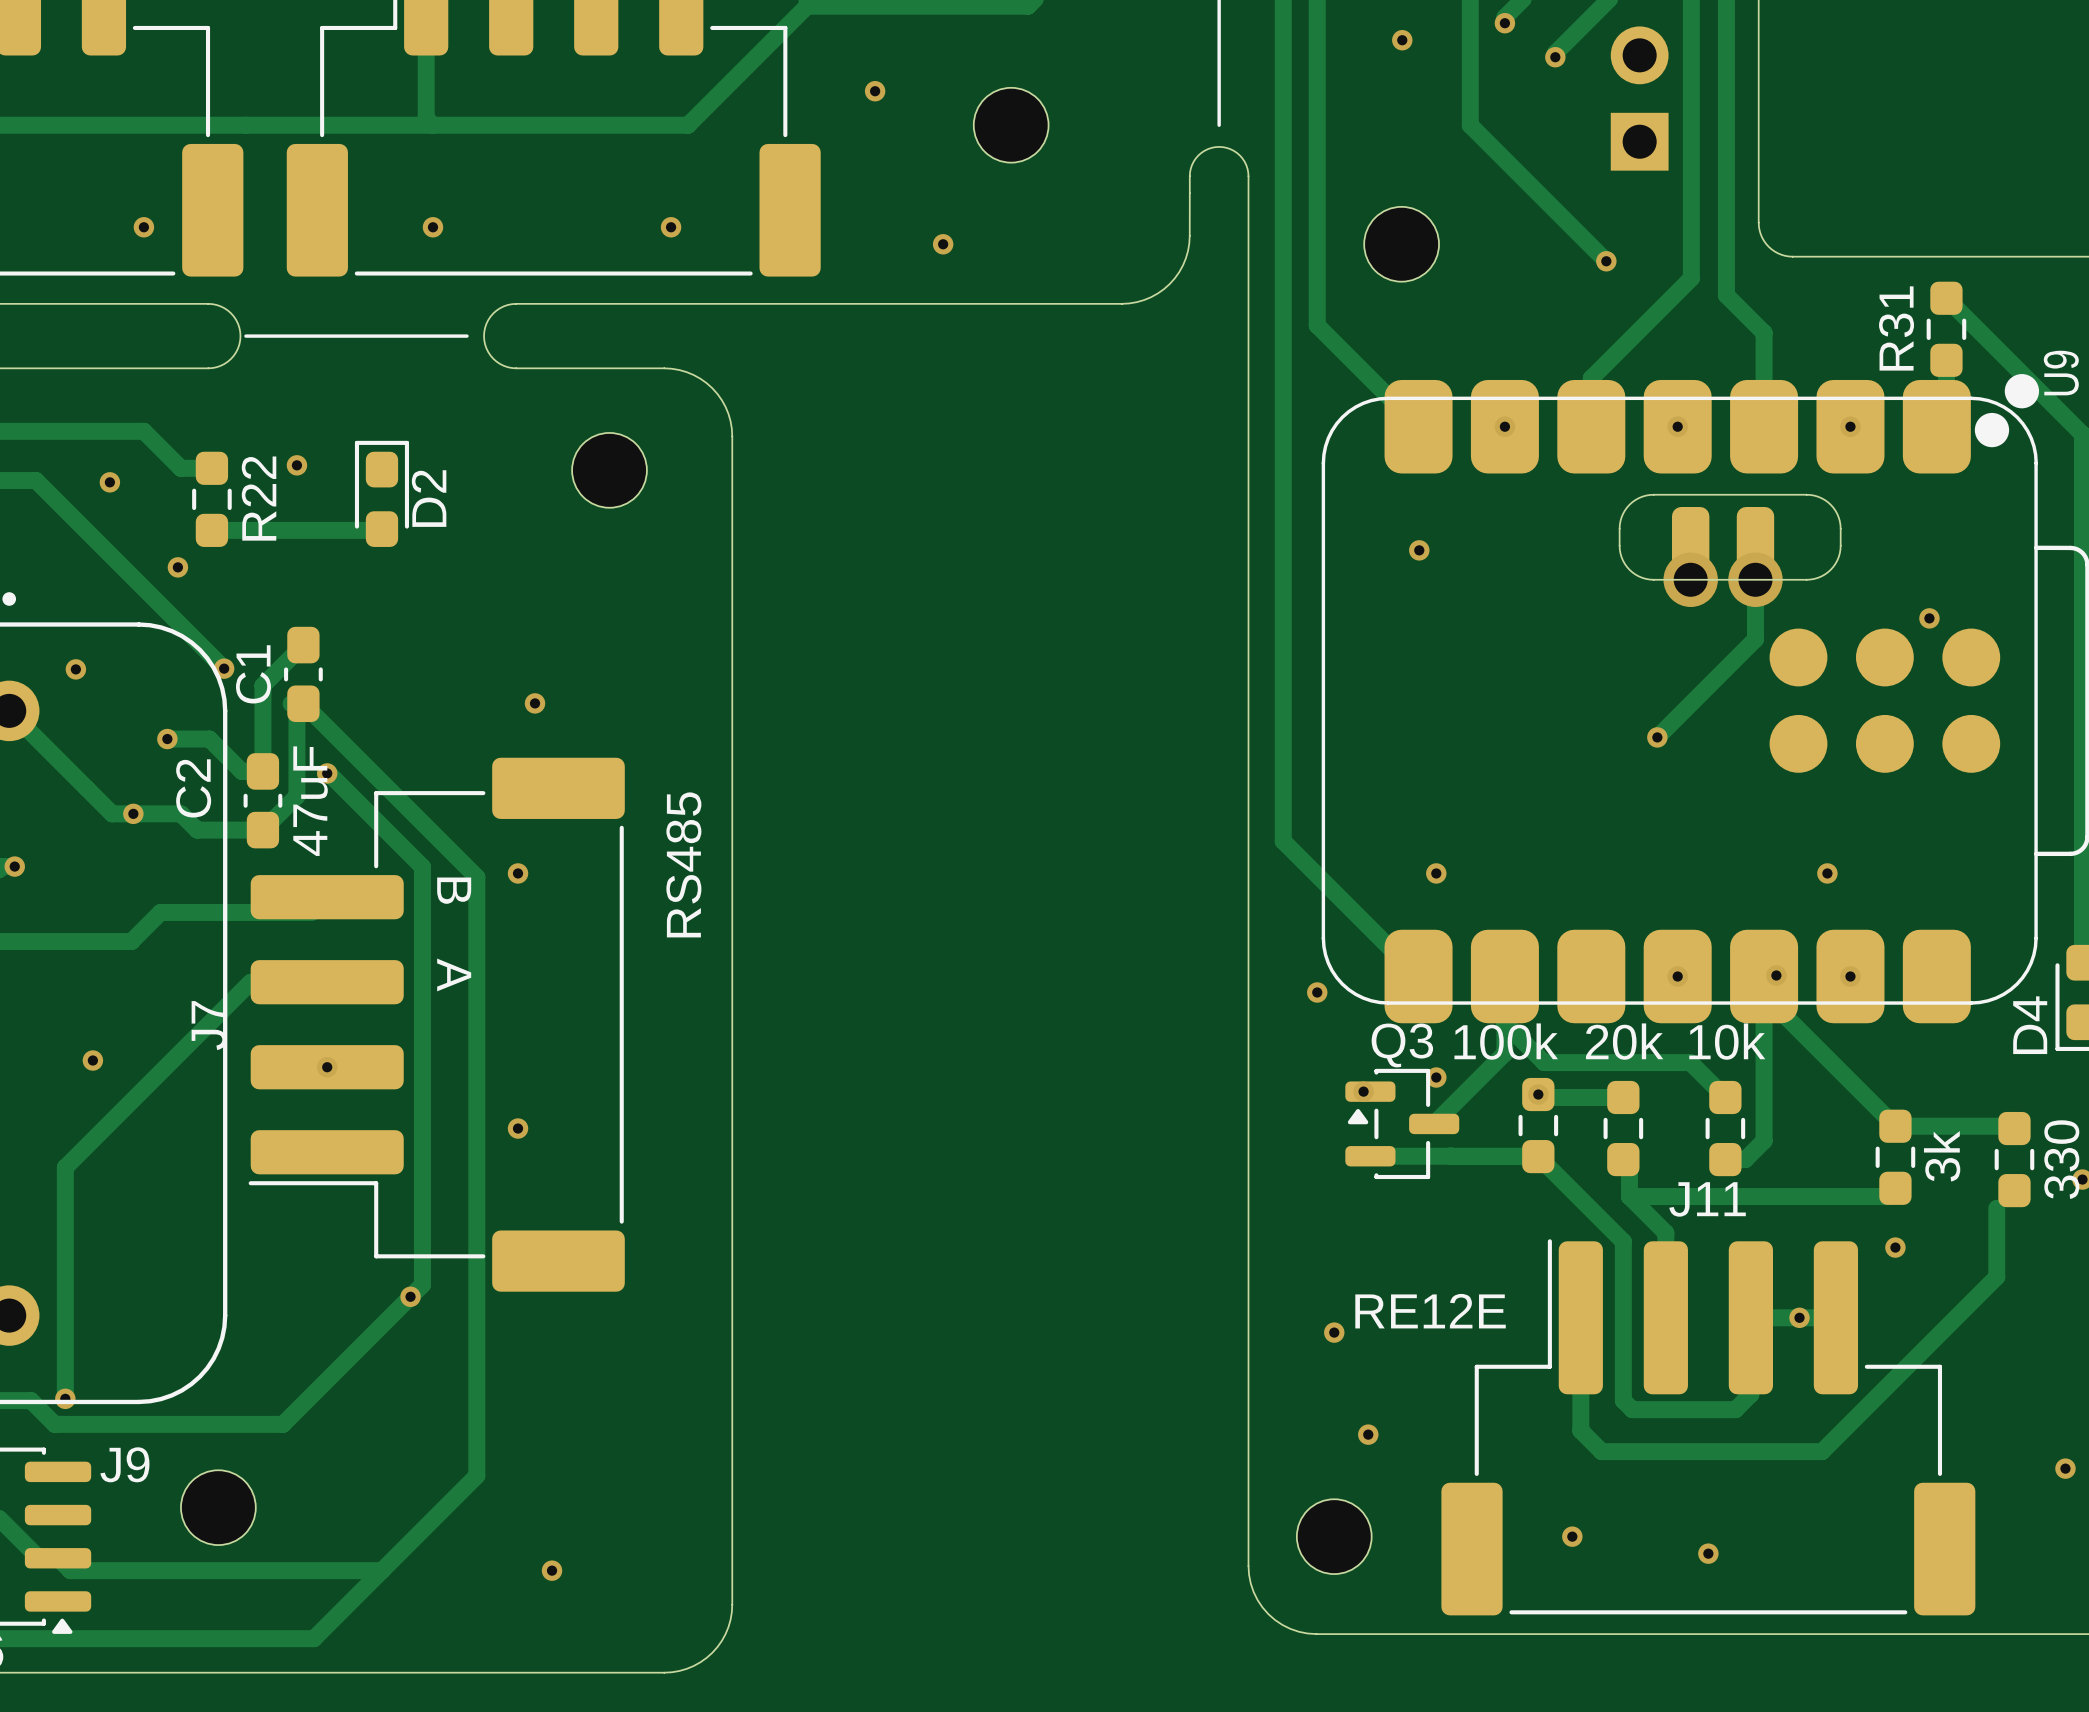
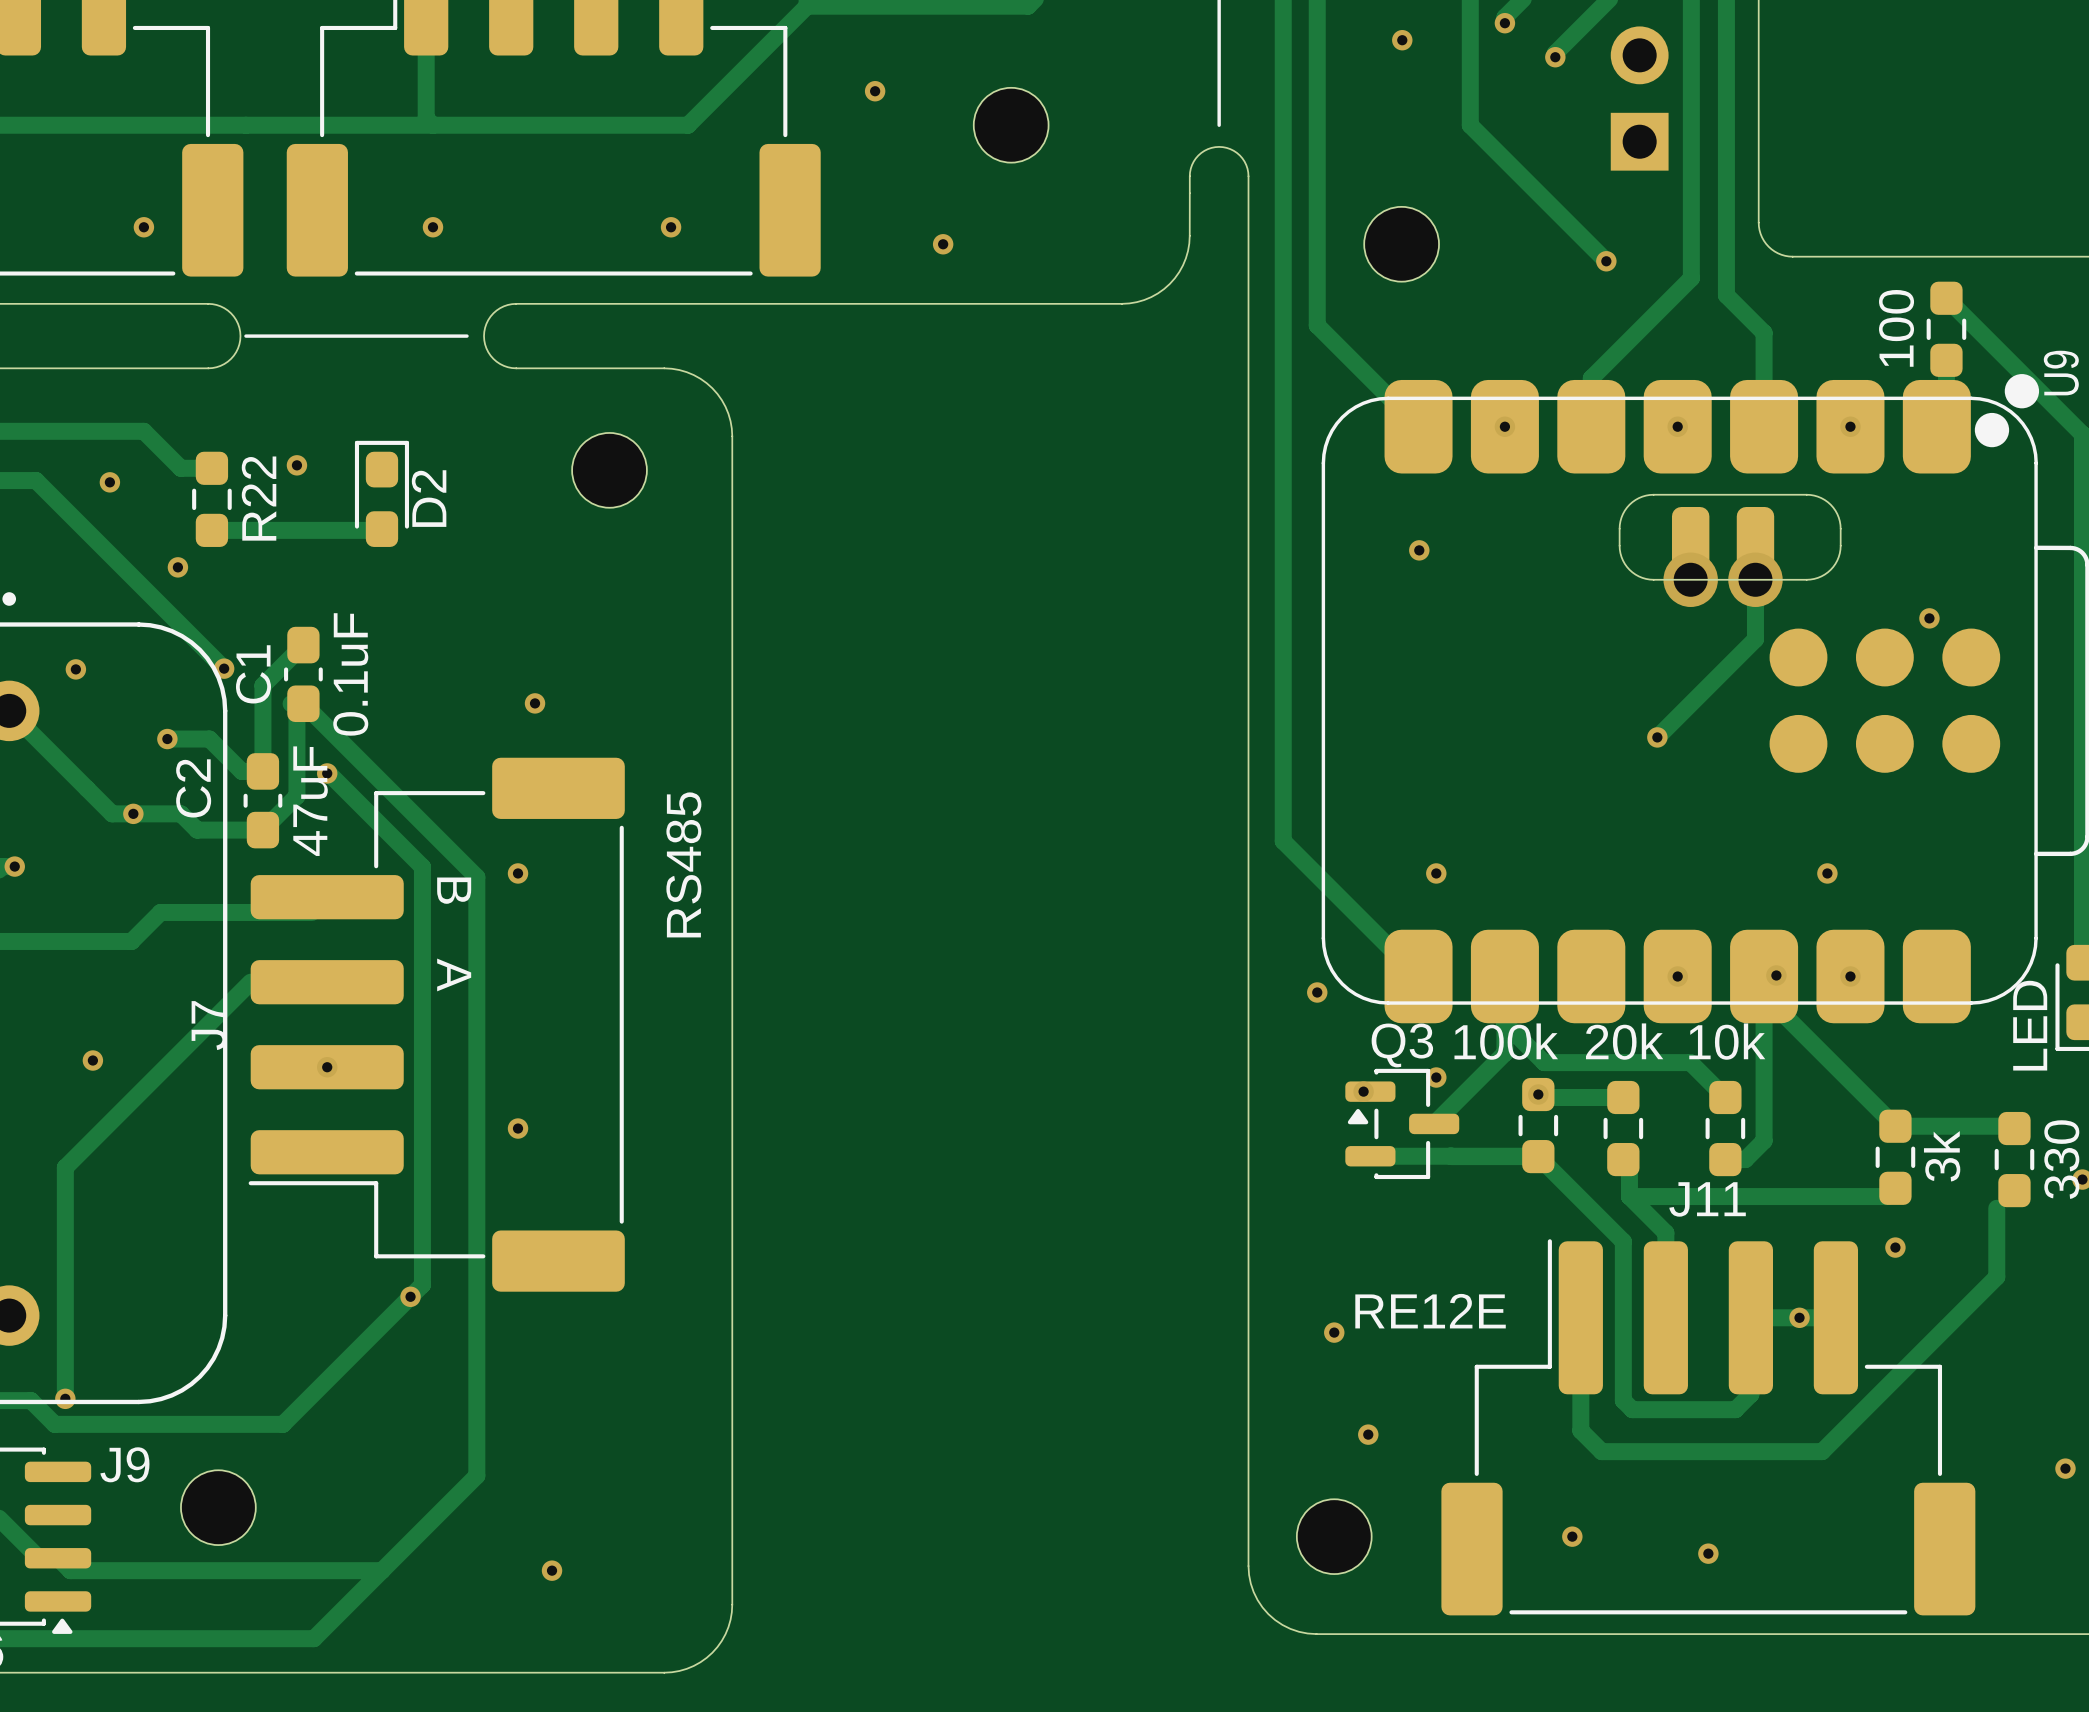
R31 name: R31 (1896, 328) -> none
R31 value: none -> 100 (1896, 328)
C1 value: none -> 0.1uF (350, 674)
D4 name: D4 (2030, 1025) -> none
D4 value: none -> LED (2030, 1025)

